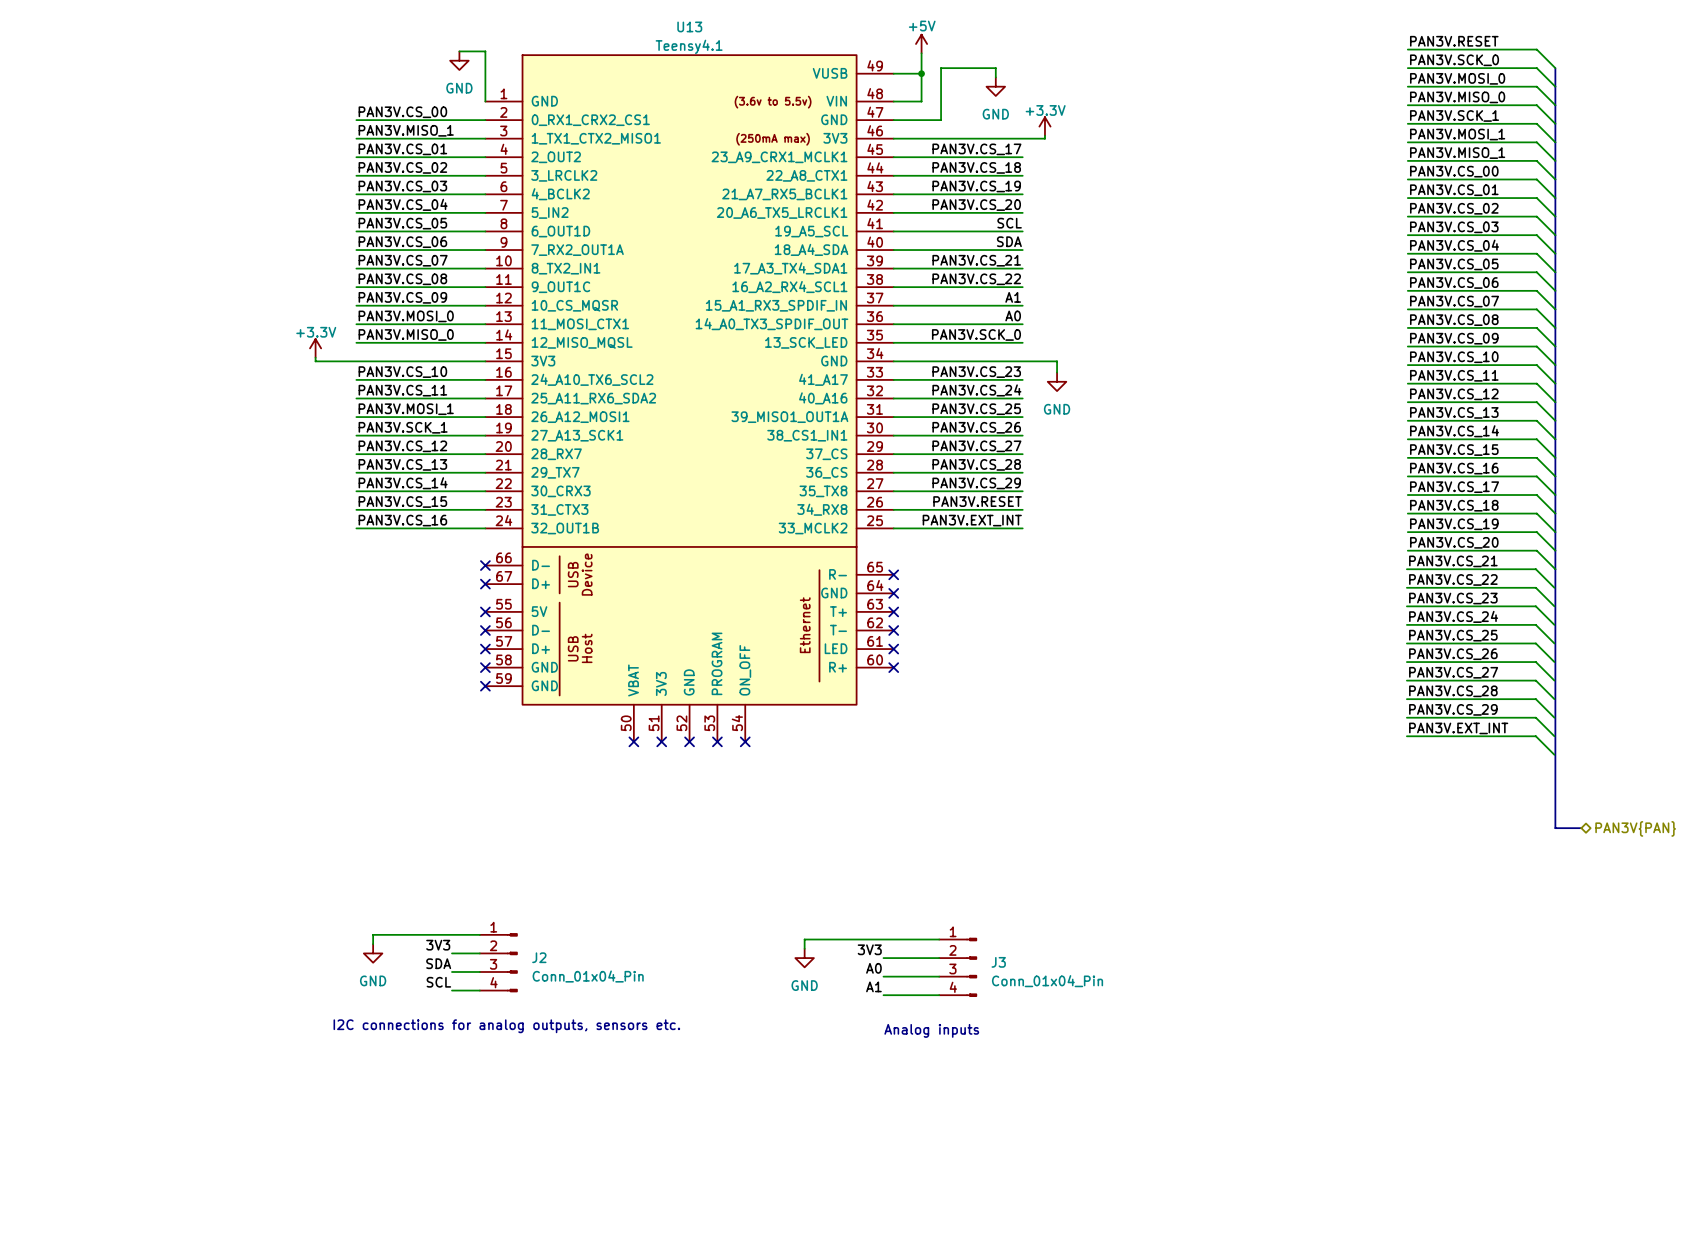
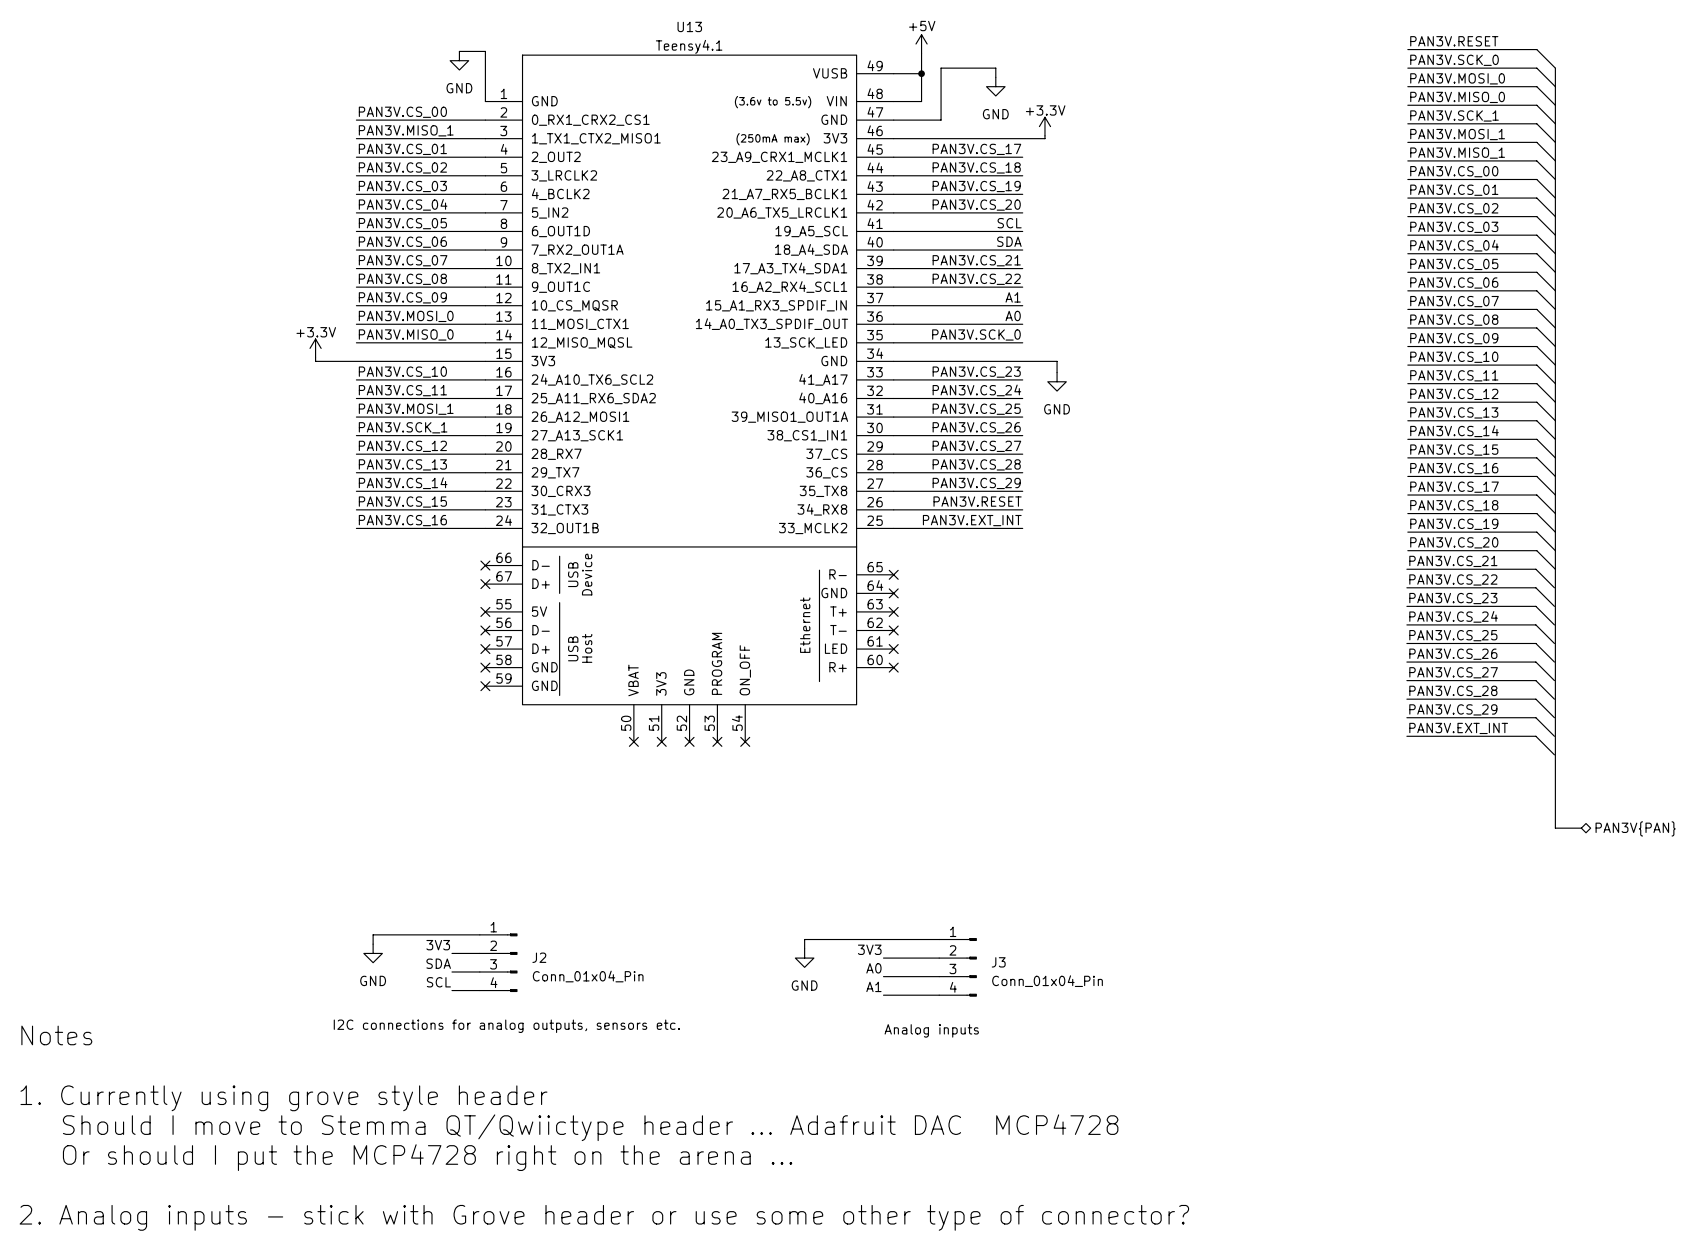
text: none -> Notes (56, 1035)
text: none -> 1. Currently using grove style header (283, 1098)
text: none -> Should I move to Stemma QT/Qwiictype header ... Adafruit DAC MCP4728 (590, 1127)
text: none -> Or should I put the MCP4728 right on the arena ... (427, 1157)
text: none -> 2. Analog inputs - stick with Grove header or use some other type of connector? (604, 1217)

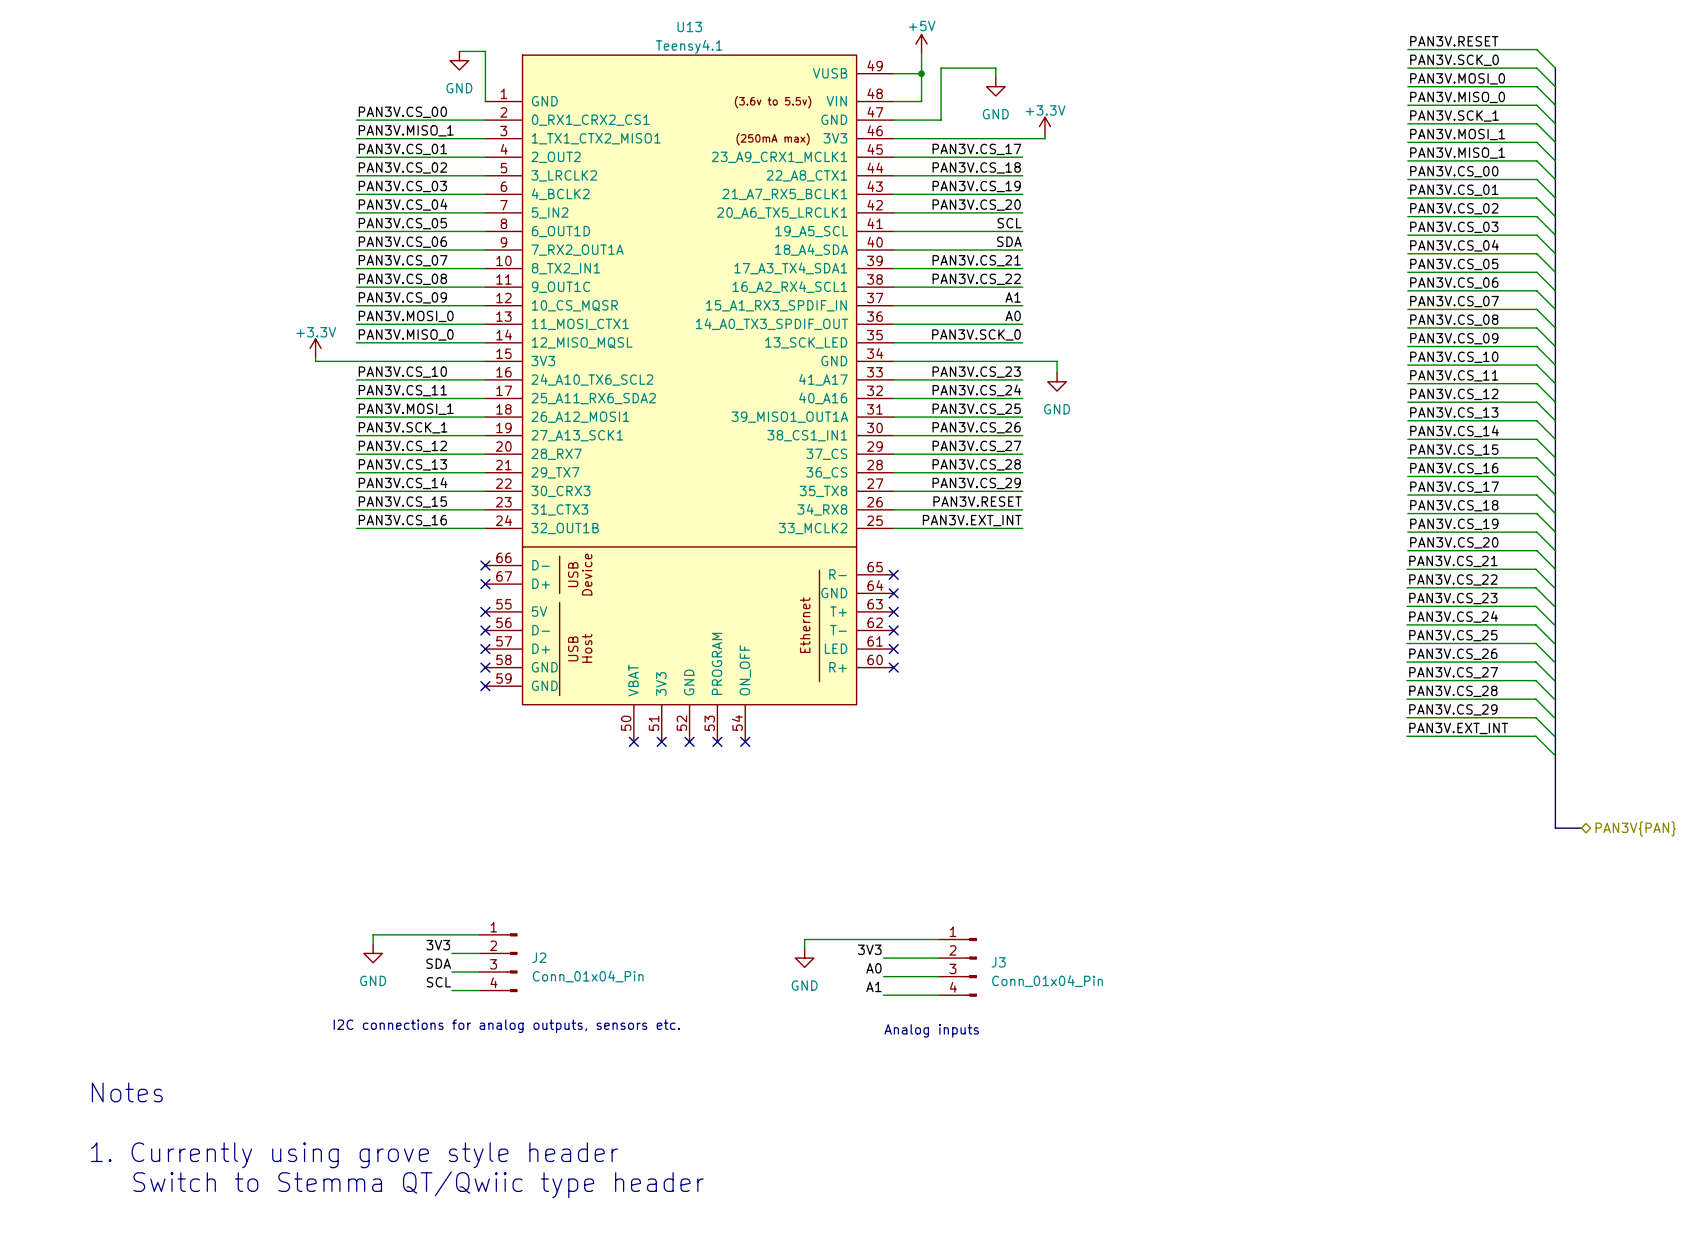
text position: Notes (56, 1035) -> Notes (127, 1092)
text position: 1. Currently using grove style header (283, 1098) -> 1. Currently using grove style header (354, 1155)
text: Should I move to Stemma QT/Qwiictype header ... Adafruit DAC MCP4728 (590, 1127) -> none
text: Or should I put the MCP4728 right on the arena ... (427, 1157) -> none
text: none -> Switch to Stemma QT/Qwiic type header (418, 1184)
text: 2. Analog inputs - stick with Grove header or use some other type of connector? (604, 1217) -> none

